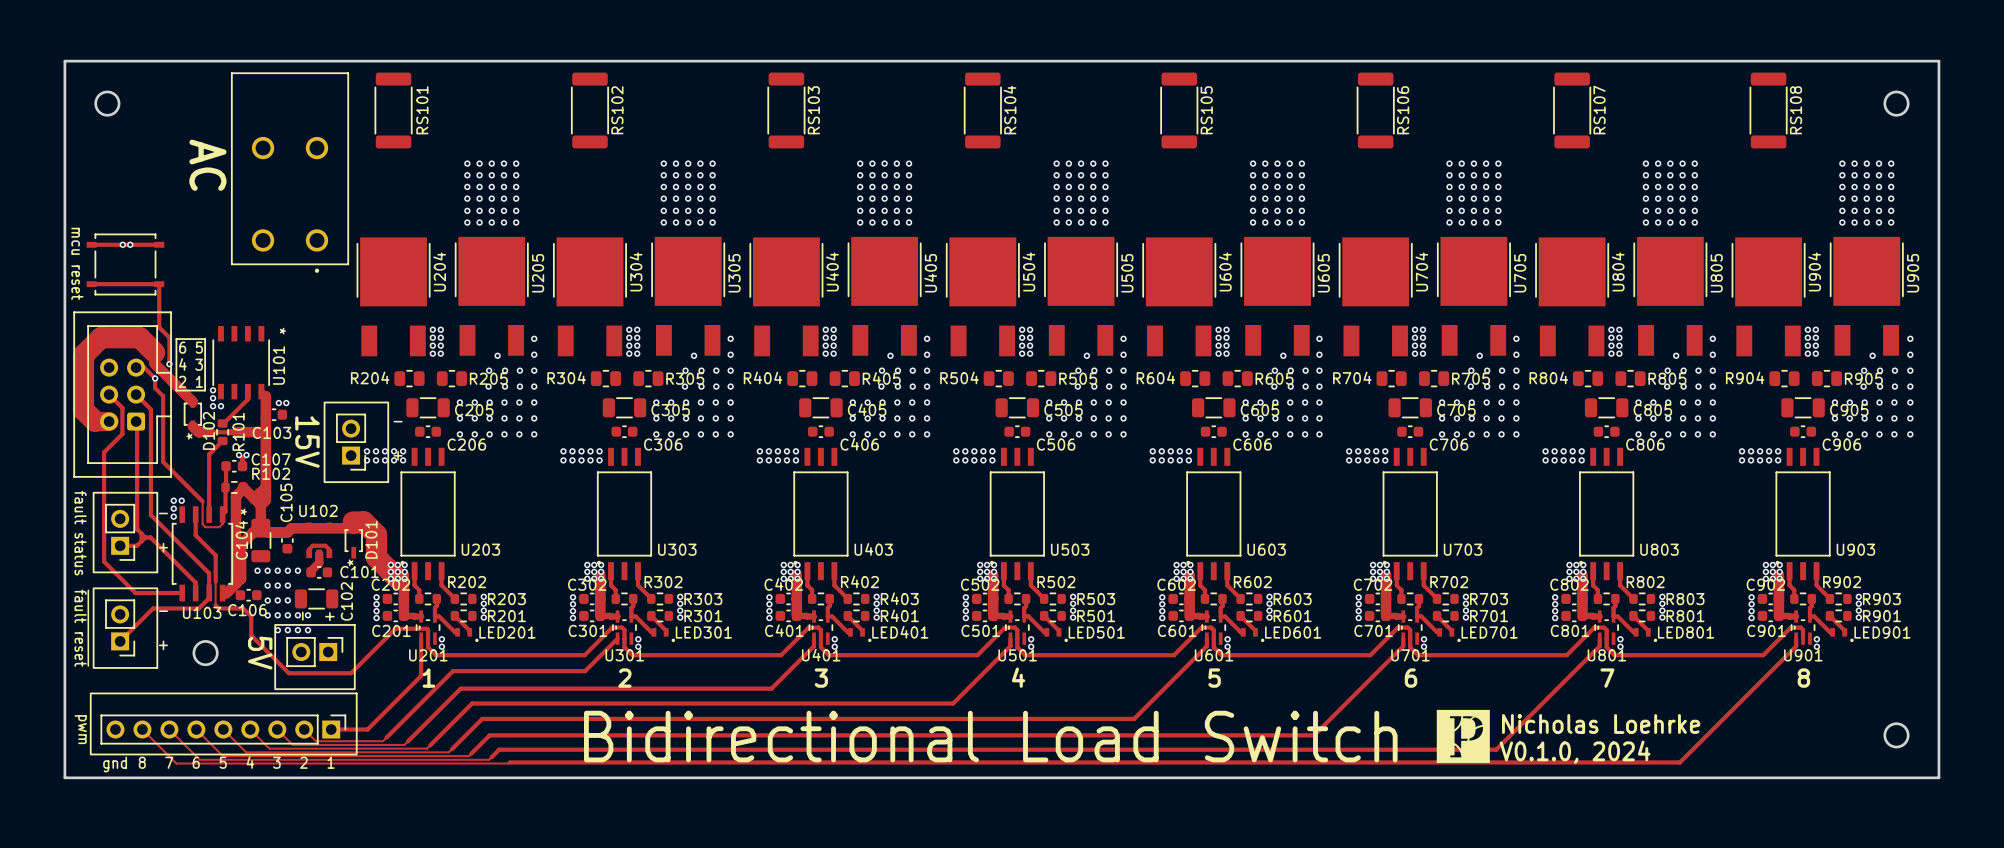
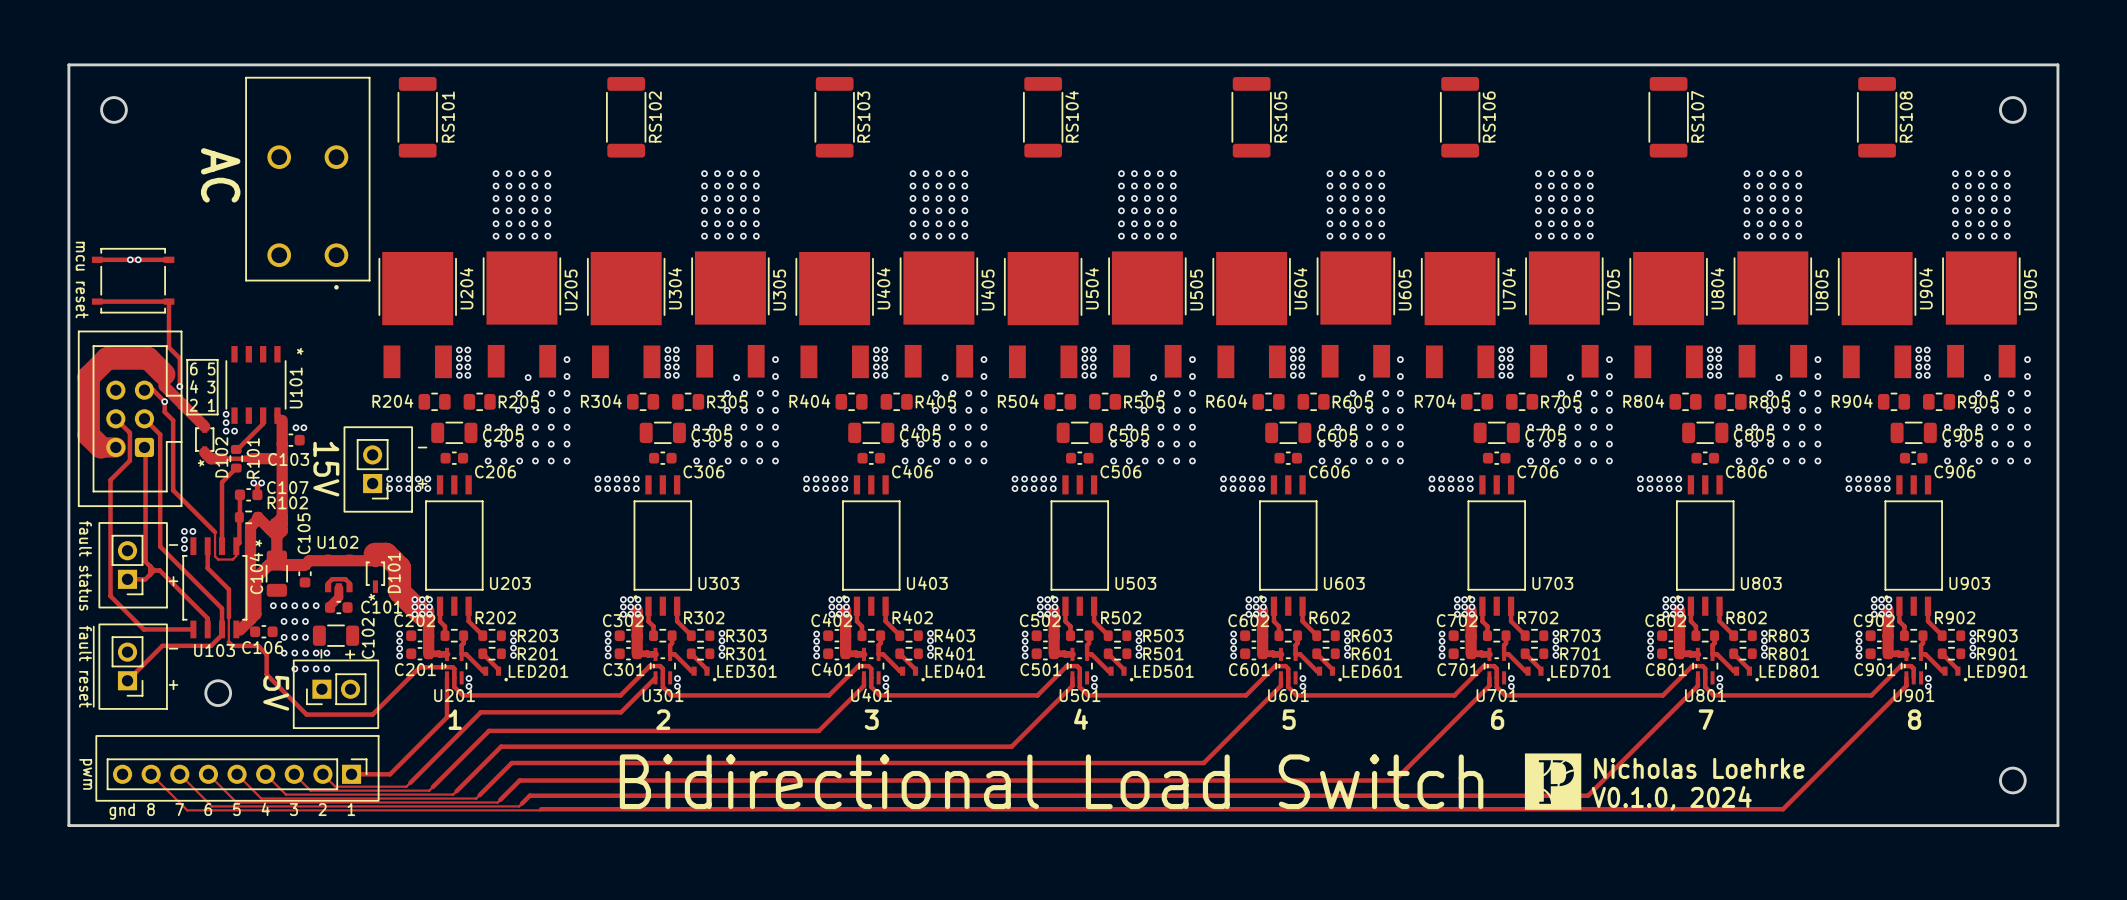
part footprint: [274, 624, 356, 690] -> [293, 659, 379, 729]

